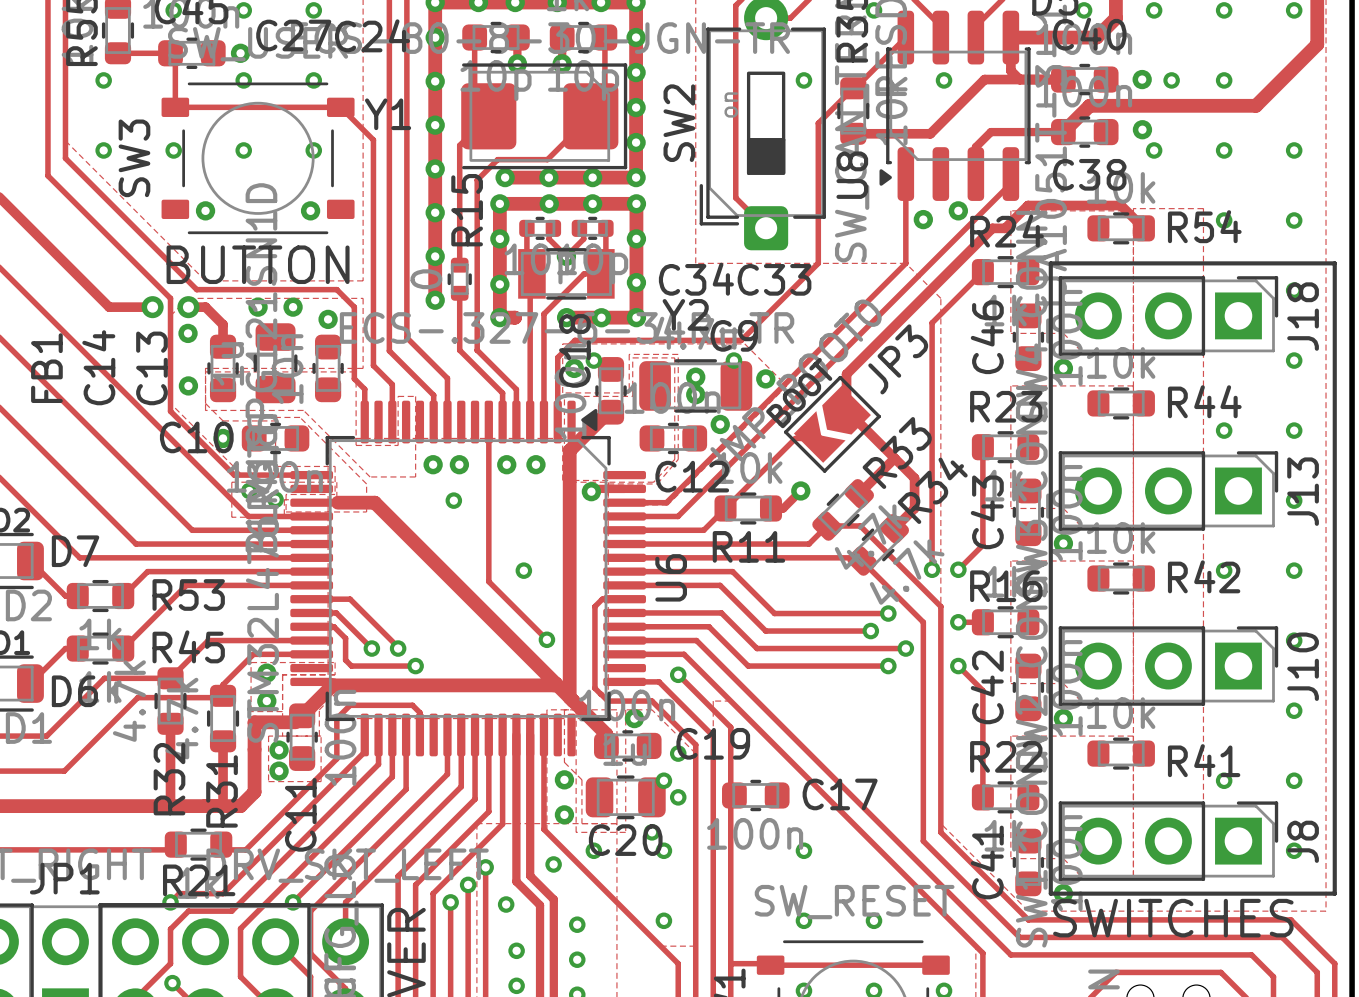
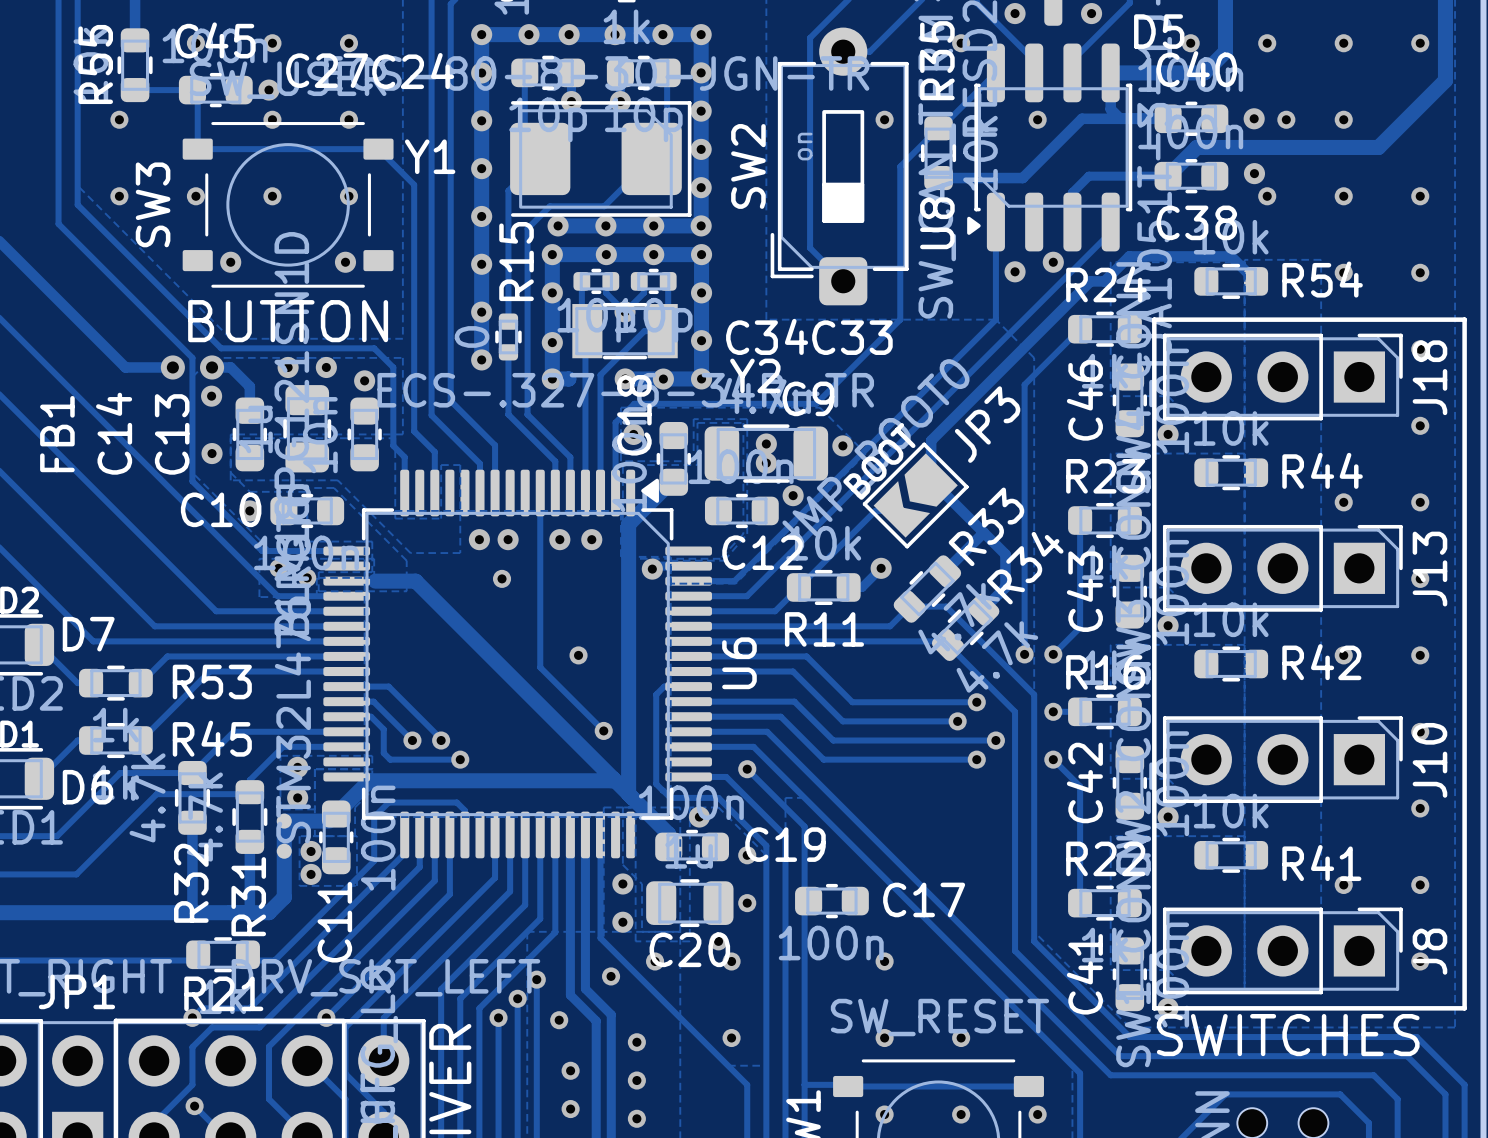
via: (593, 360) -> none
via: (733, 360) -> none
via: (663, 780) -> none

